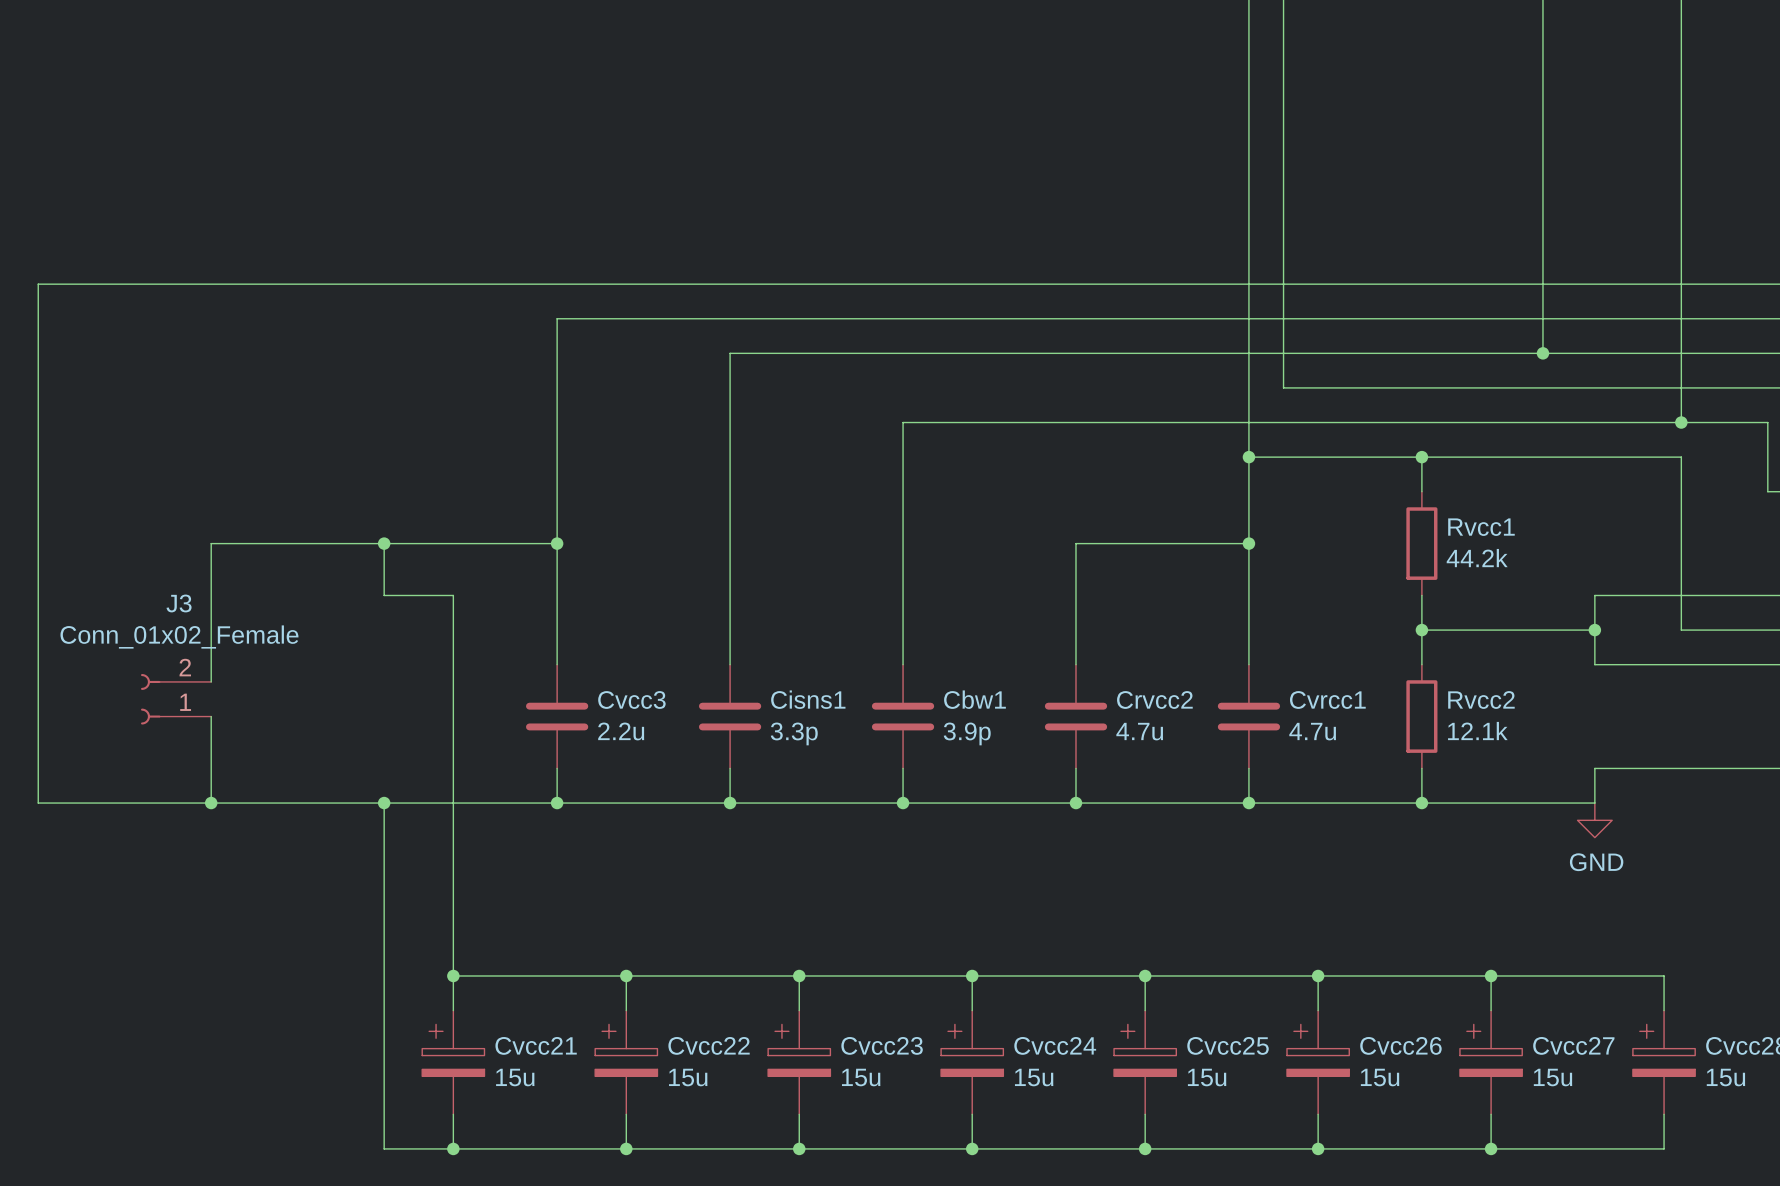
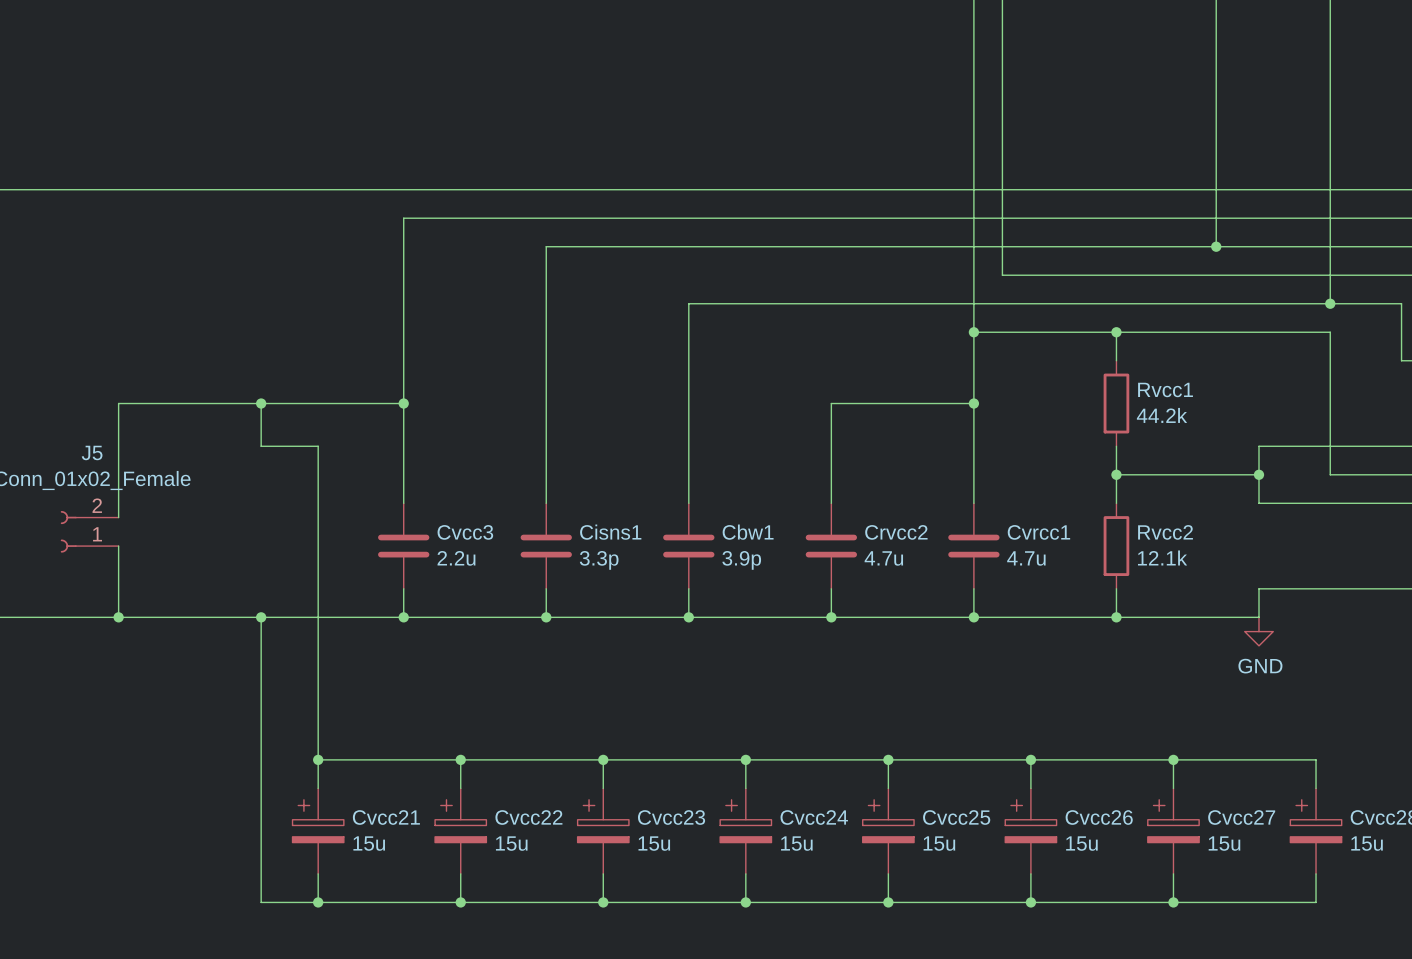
J3 name: J3 (179, 603) -> J5 (92, 452)

